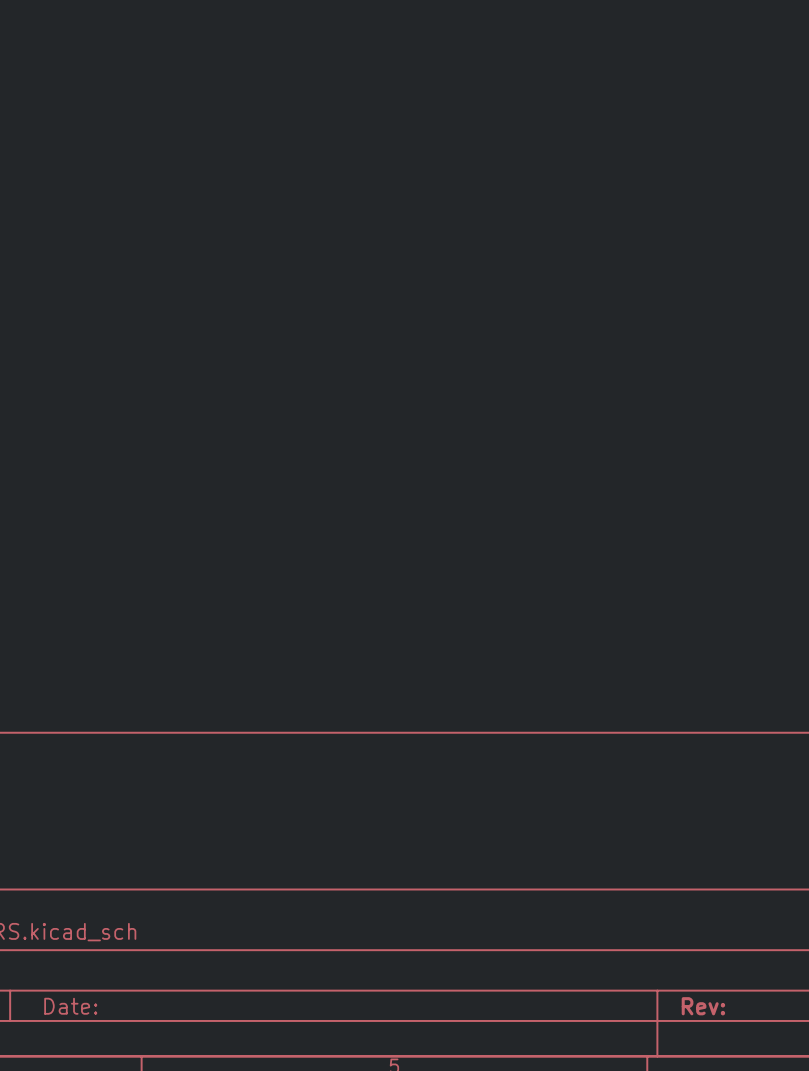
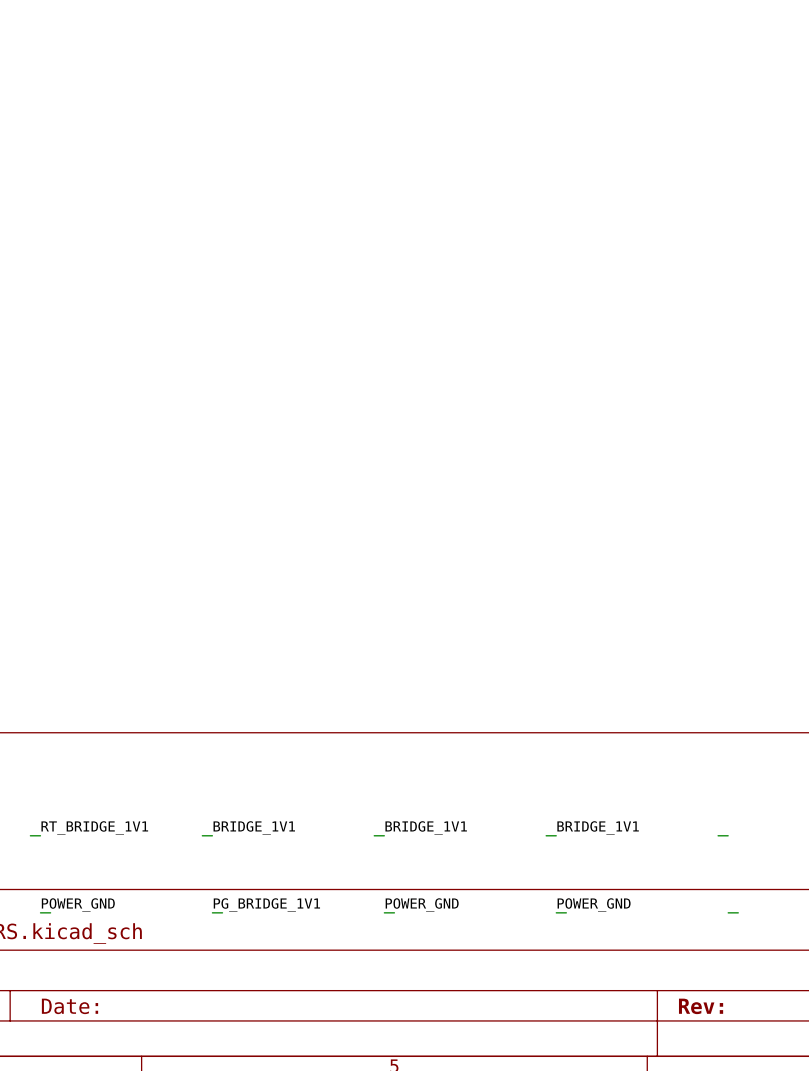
label: none -> RT_BRIDGE_1V1 (94, 827)
label: none -> BRIDGE_1V1 (254, 827)
label: none -> BRIDGE_1V1 (426, 827)
label: none -> BRIDGE_1V1 (598, 827)
wire: none -> (30, 835) (40, 835)
wire: none -> (202, 835) (212, 835)
wire: none -> (374, 835) (384, 835)
wire: none -> (546, 835) (556, 835)
wire: none -> (718, 835) (728, 835)
label: none -> POWER_GND (78, 905)
label: none -> PG_BRIDGE_1V1 (266, 905)
label: none -> POWER_GND (422, 905)
label: none -> POWER_GND (594, 905)
wire: none -> (40, 912) (50, 912)
wire: none -> (212, 912) (222, 912)
wire: none -> (384, 912) (394, 912)
wire: none -> (556, 912) (566, 912)
wire: none -> (728, 912) (738, 912)

